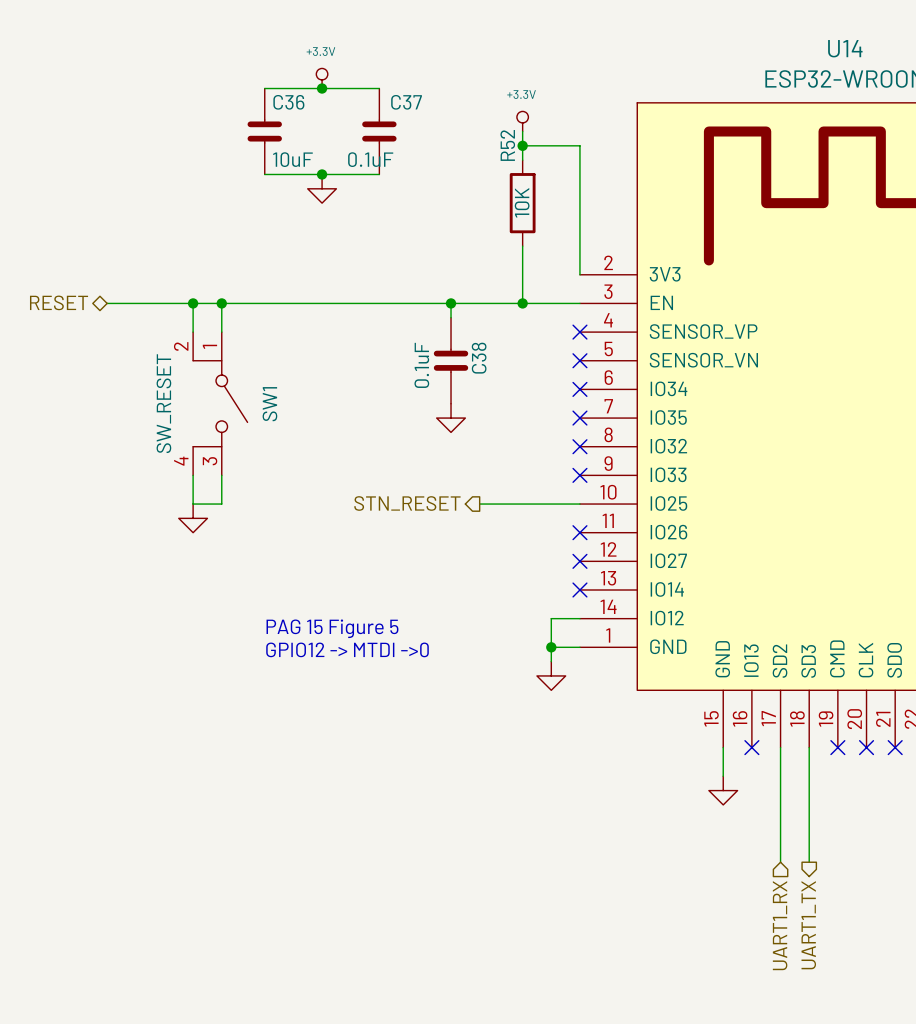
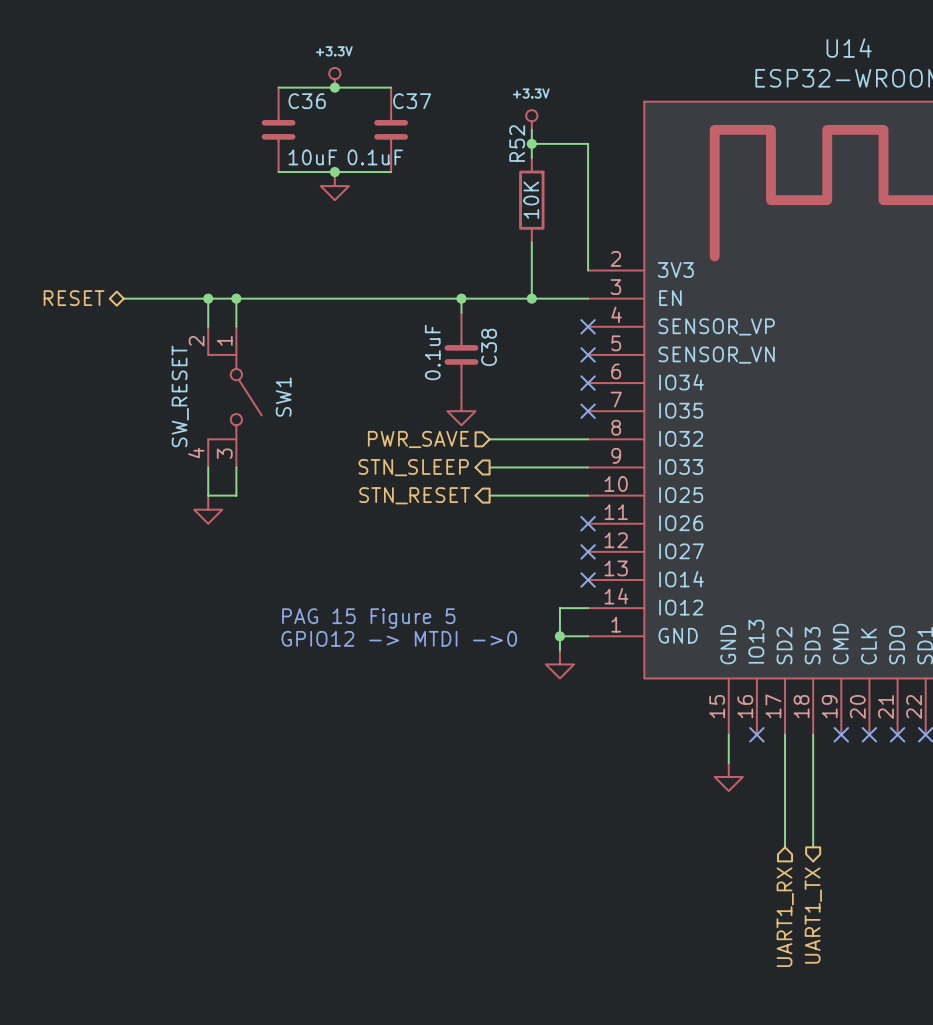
hierarchical label: none -> PWR_SAVE (418, 439)
wire: none -> (489, 439) (588, 439)
no-connect mark: (579, 446) -> none
hierarchical label: none -> STN_SLEEP (413, 467)
wire: none -> (489, 467) (588, 467)
no-connect mark: (579, 475) -> none

